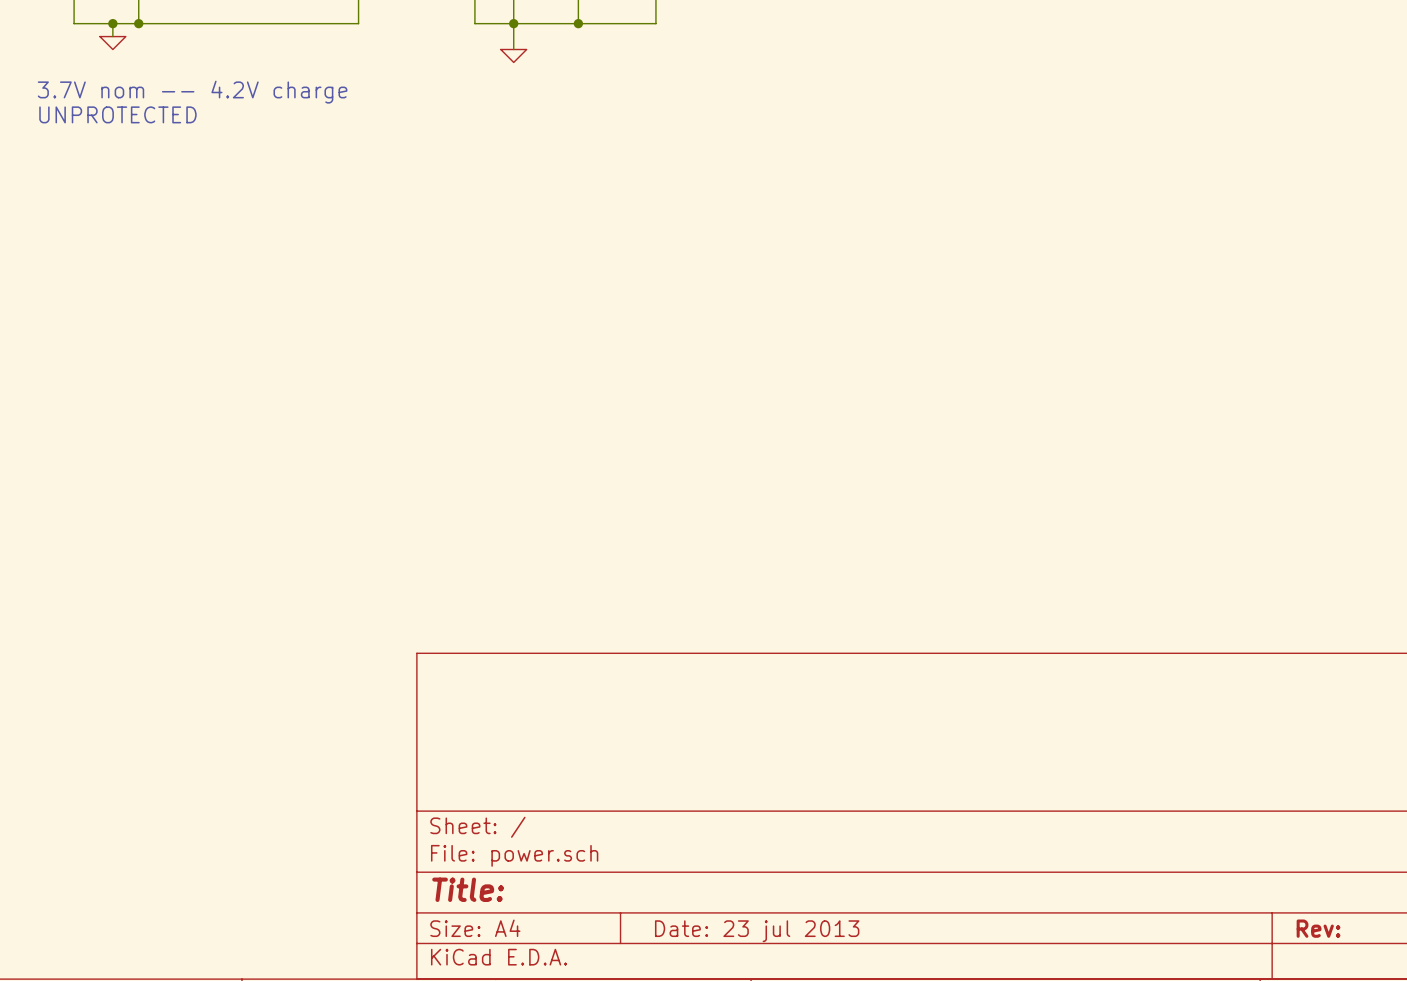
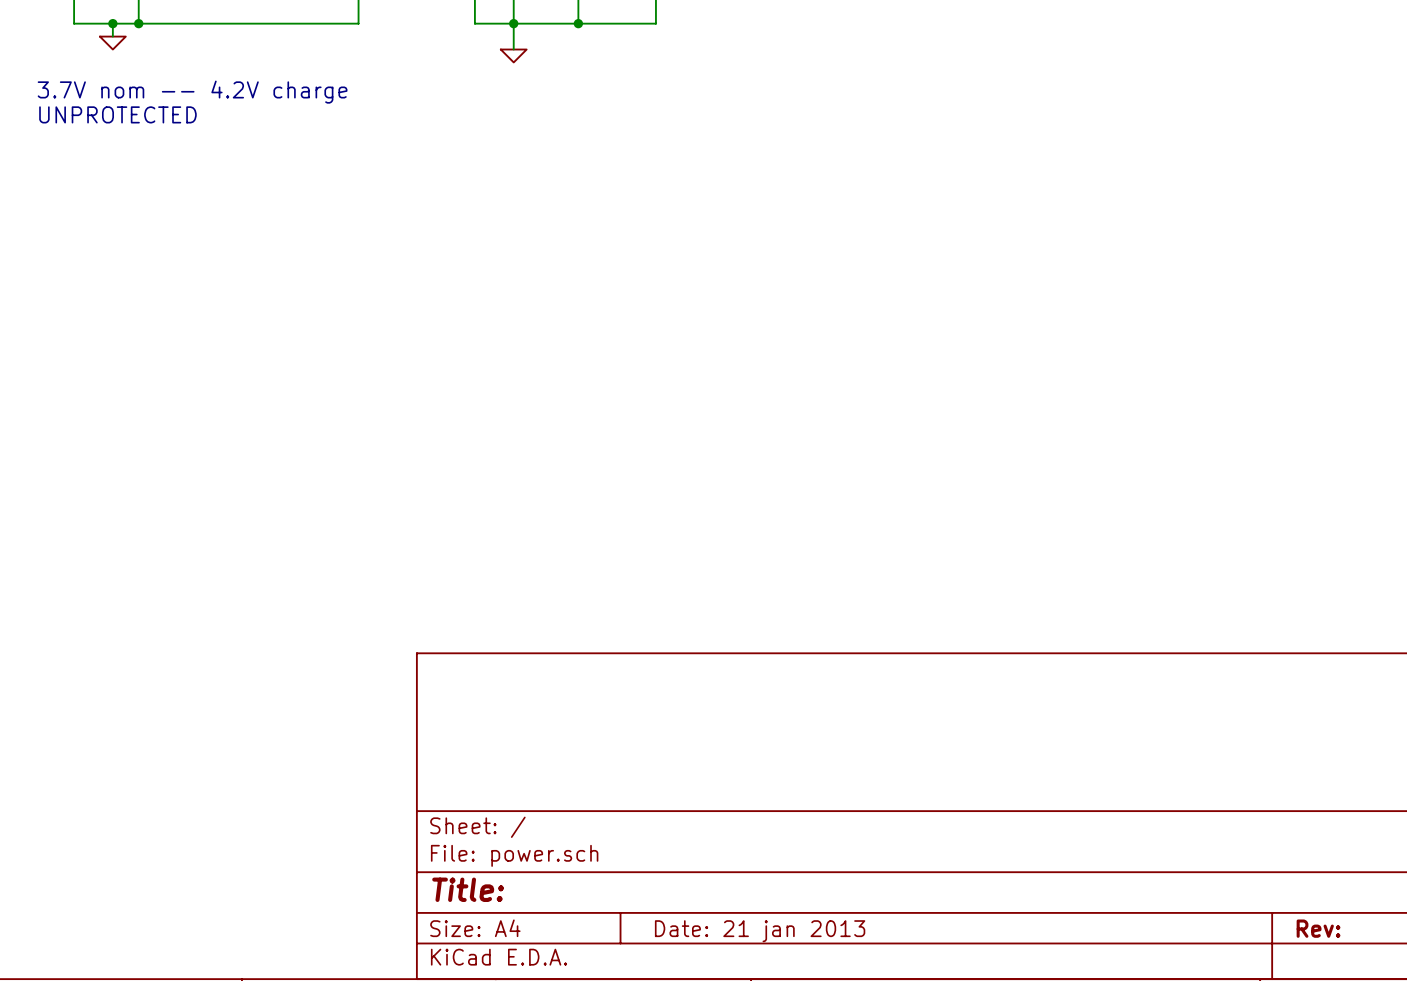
title block: Date: 23 jul 2013 (757, 931) -> Date: 21 jan 2013 (760, 931)

